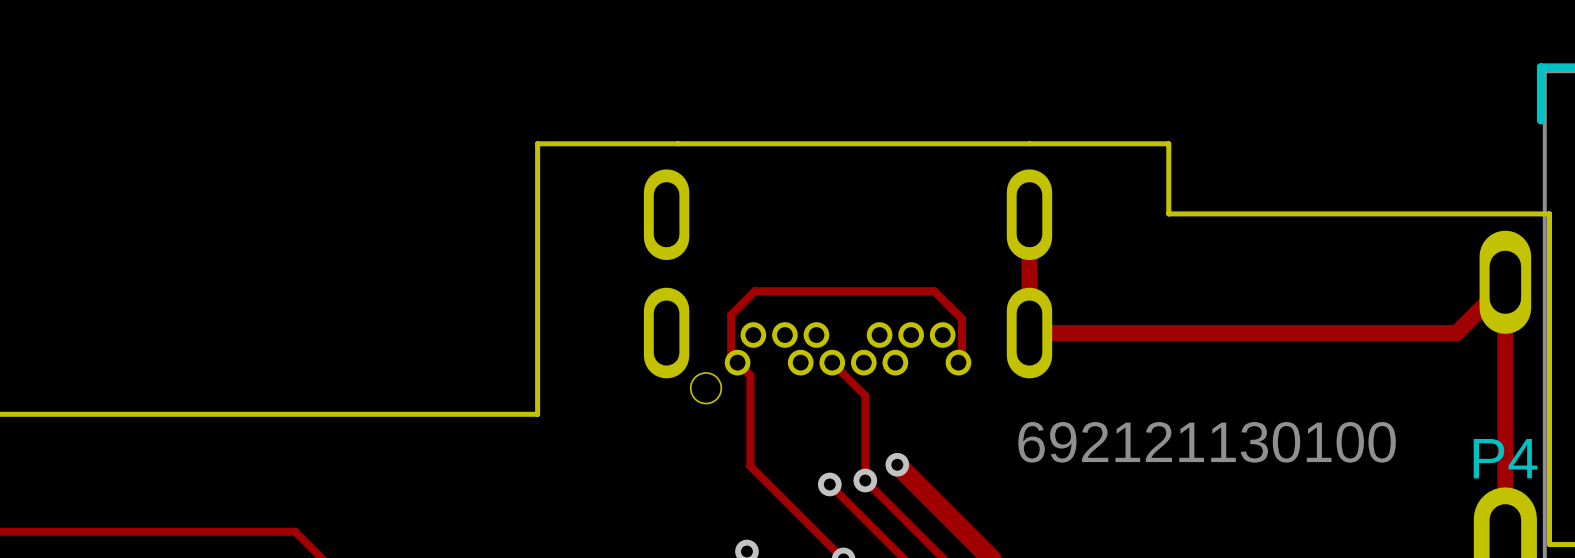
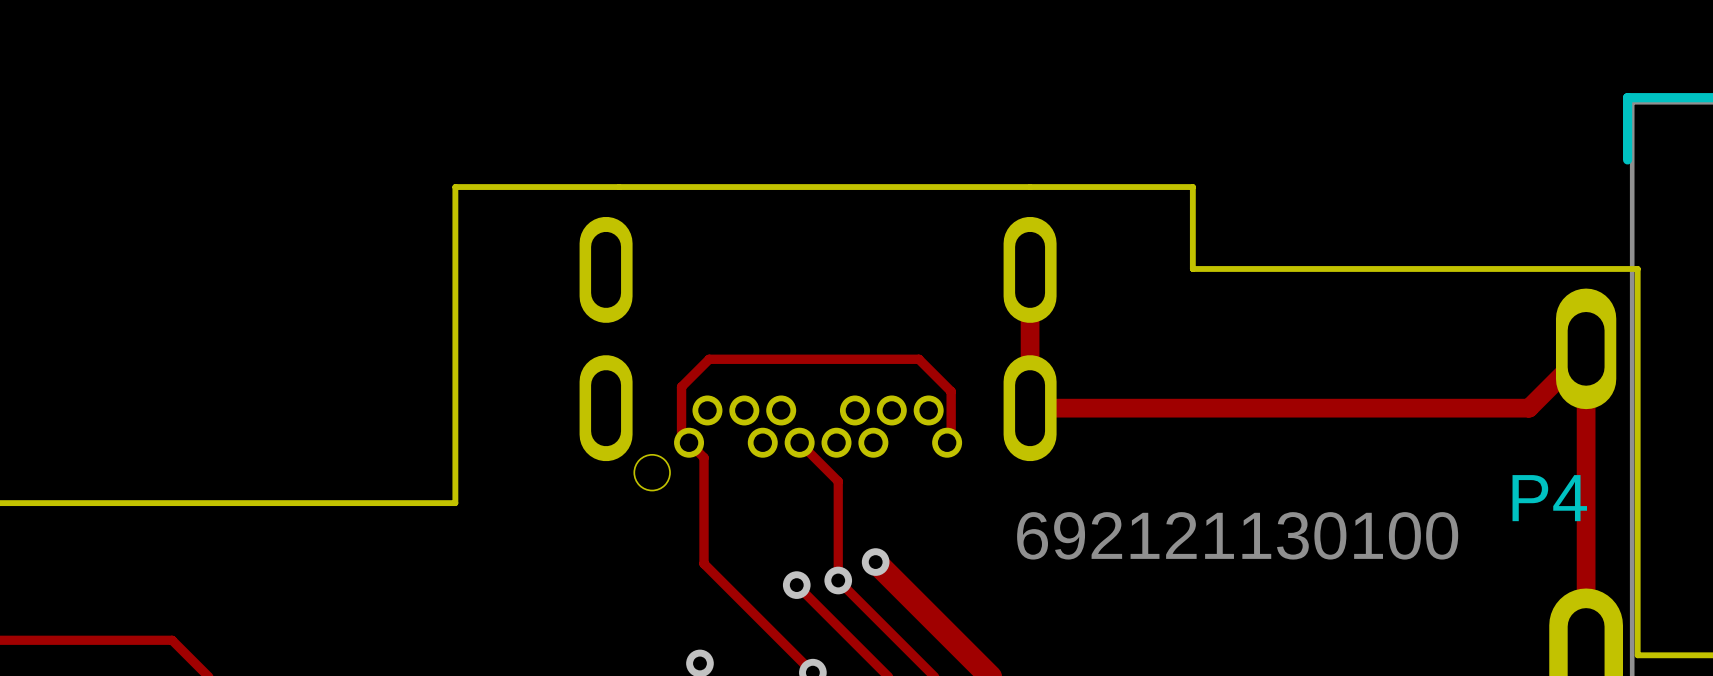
P4 name position: P4 (1505, 458) -> P4 (1549, 498)

